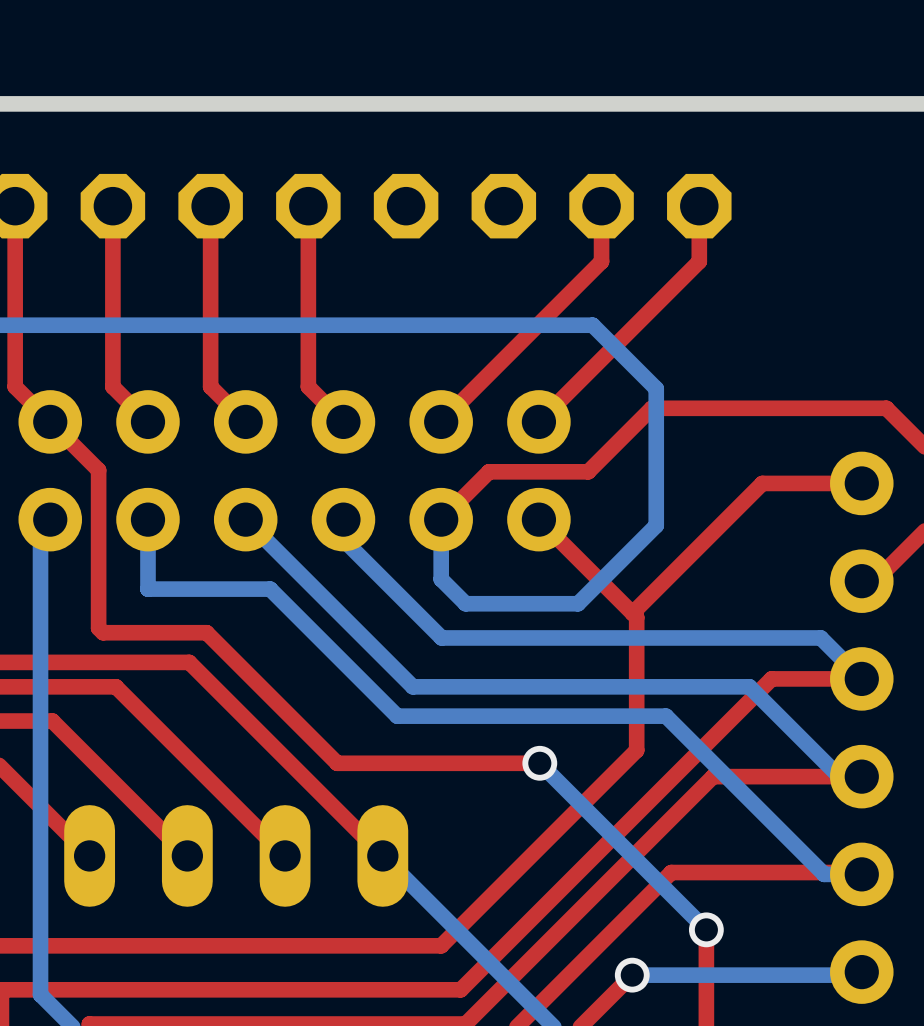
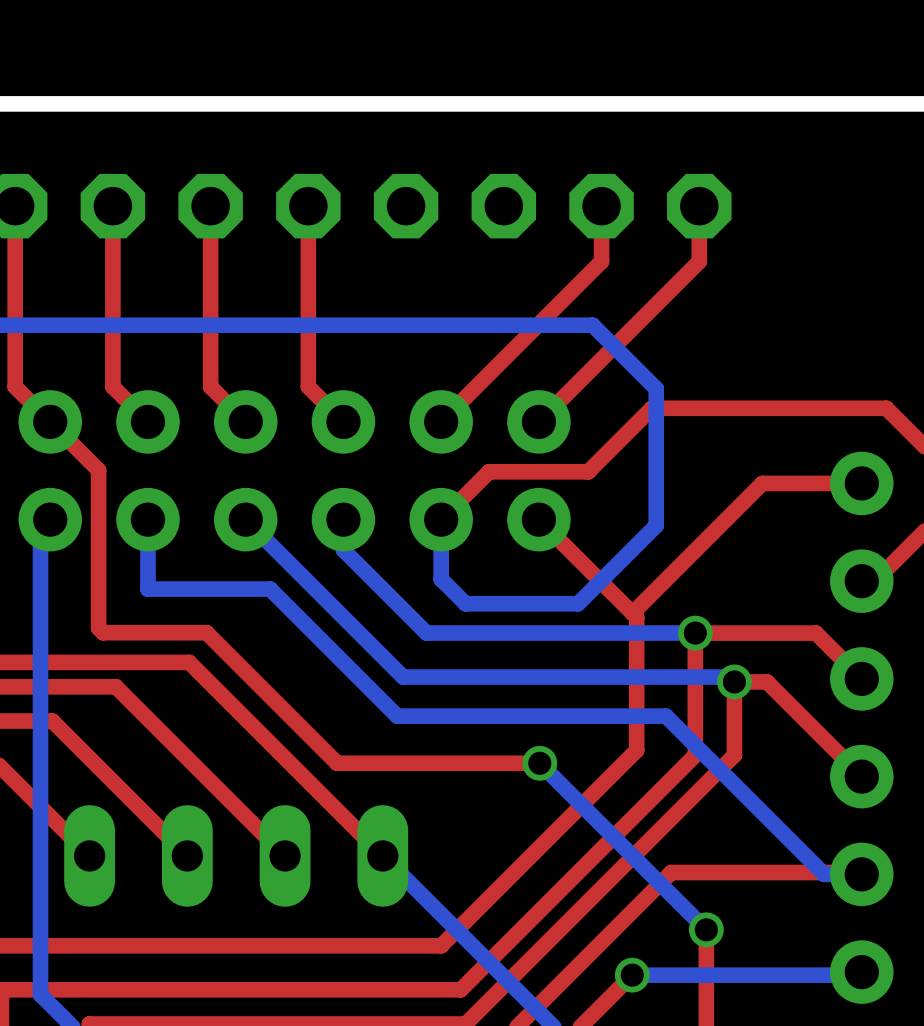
bottom track: (343, 539) (441, 637) (820, 637) (861, 678) -> (343, 539) (343, 549) (426, 633) (695, 633)
via: none -> (695, 633)
bottom track: (403, 677) (412, 686) (749, 686) (839, 776) (861, 776) -> (403, 677) (729, 677) (734, 681)
top track: (861, 678) (771, 678) (695, 755) -> (861, 678) (815, 633) (695, 633) (695, 755)
via: none -> (734, 681)
top track: (861, 776) (713, 776) -> (861, 776) (767, 681) (734, 681) (734, 755) (713, 776)

